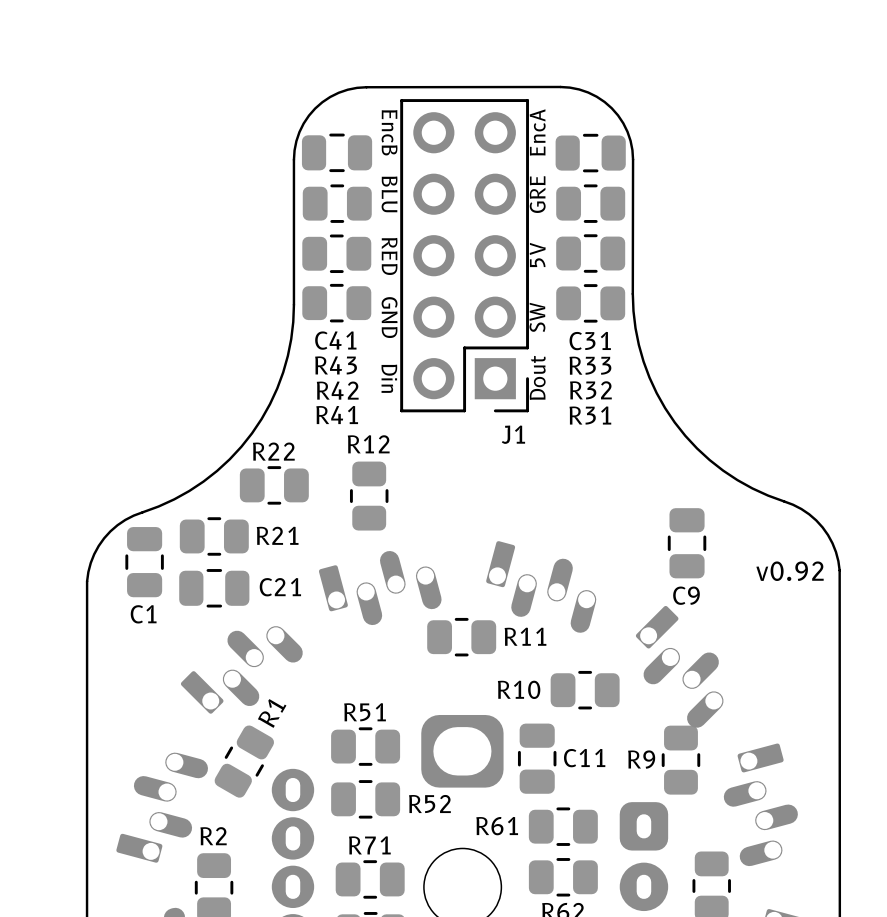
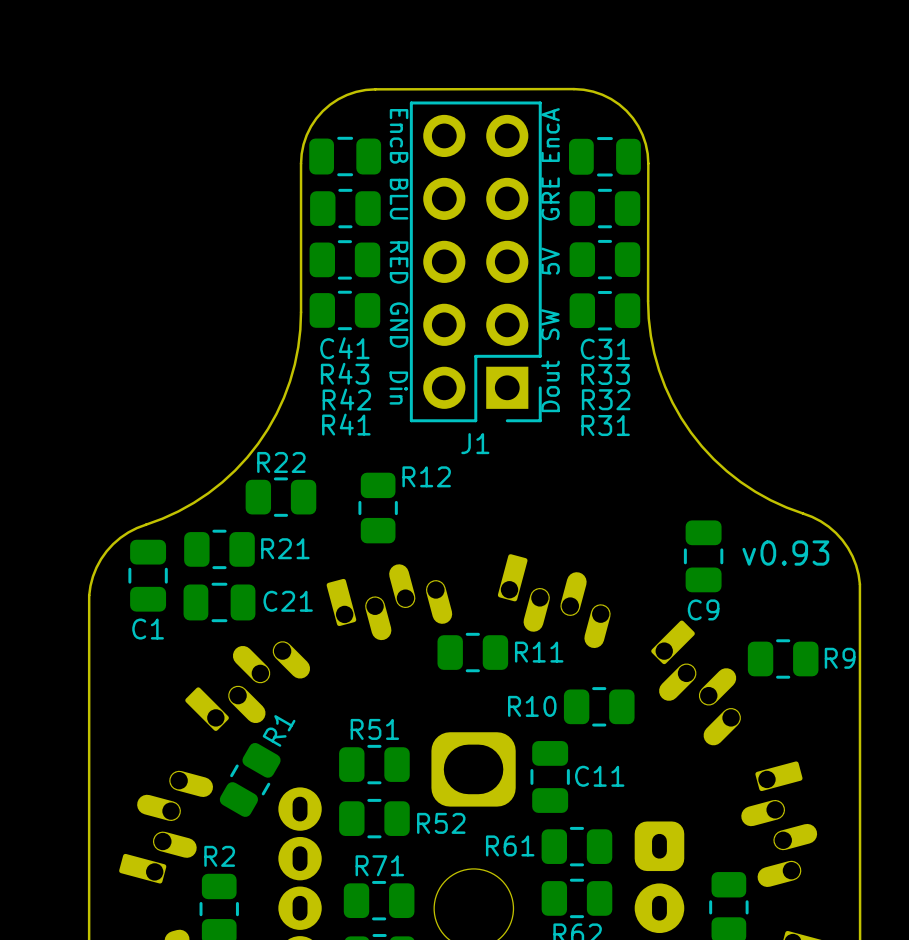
J1 name position: J1 (513, 434) -> J1 (475, 443)
R12 name position: R12 (368, 444) -> R12 (426, 476)
text: v0.92 (790, 571) -> v0.93 (785, 553)
R9 name position: R9 (641, 759) -> R9 (840, 658)
R9 rotation: 0° (680, 760) -> 90° clockwise (783, 658)
R9 position: (680, 760) -> (783, 658)

